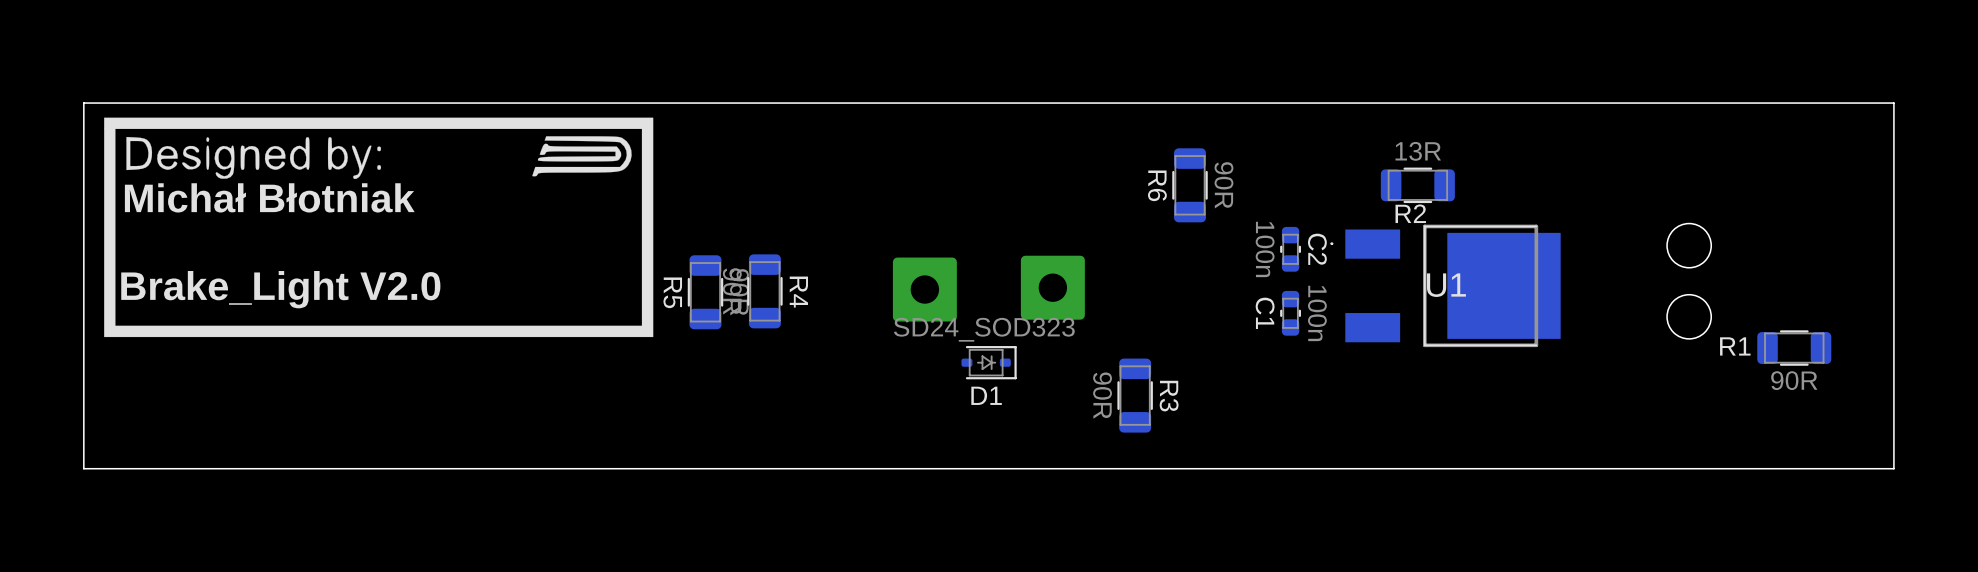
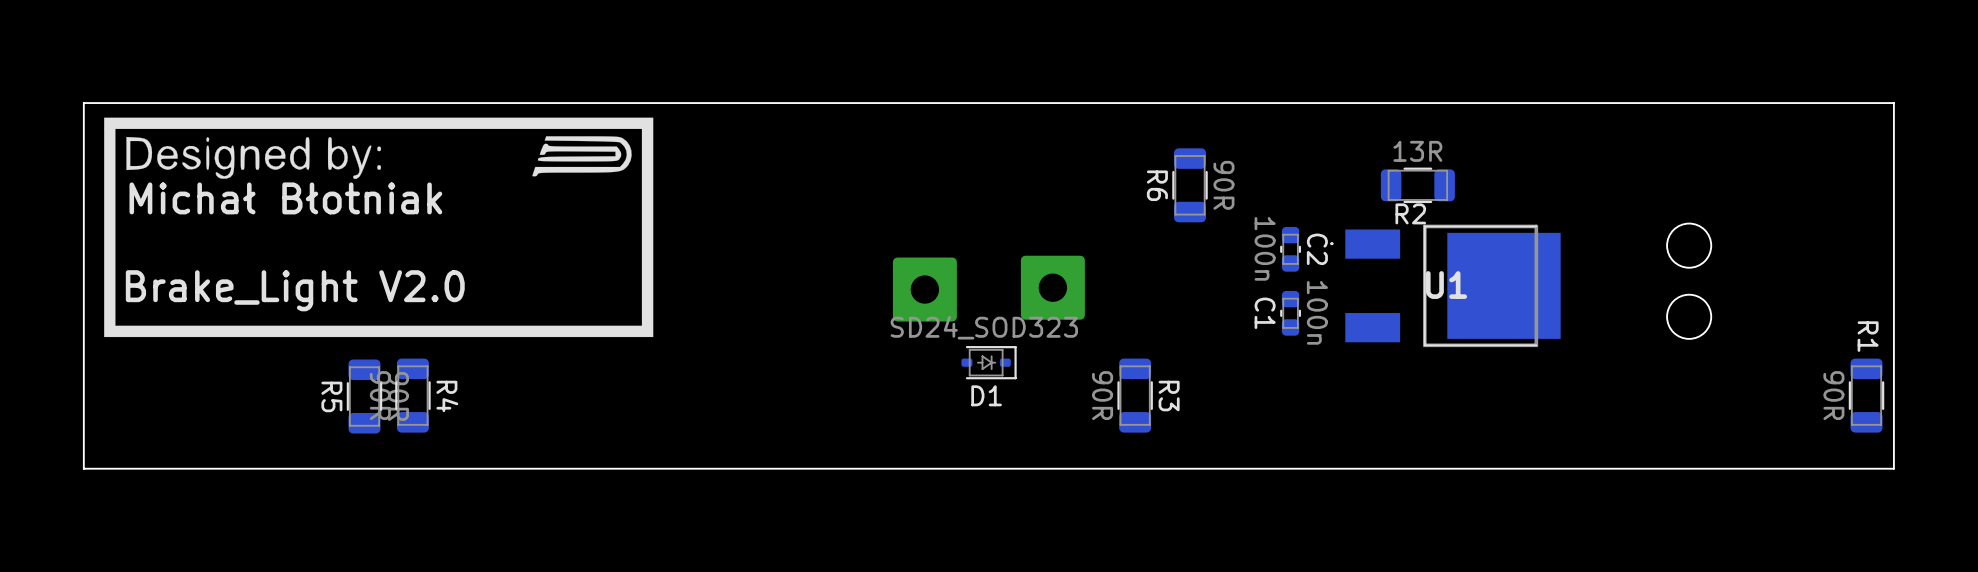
R4 position: (764, 291) -> (412, 395)
R5 position: (705, 292) -> (364, 396)
R1 rotation: 0° (1794, 348) -> 90° clockwise (1866, 395)
R1 position: (1794, 348) -> (1866, 395)

